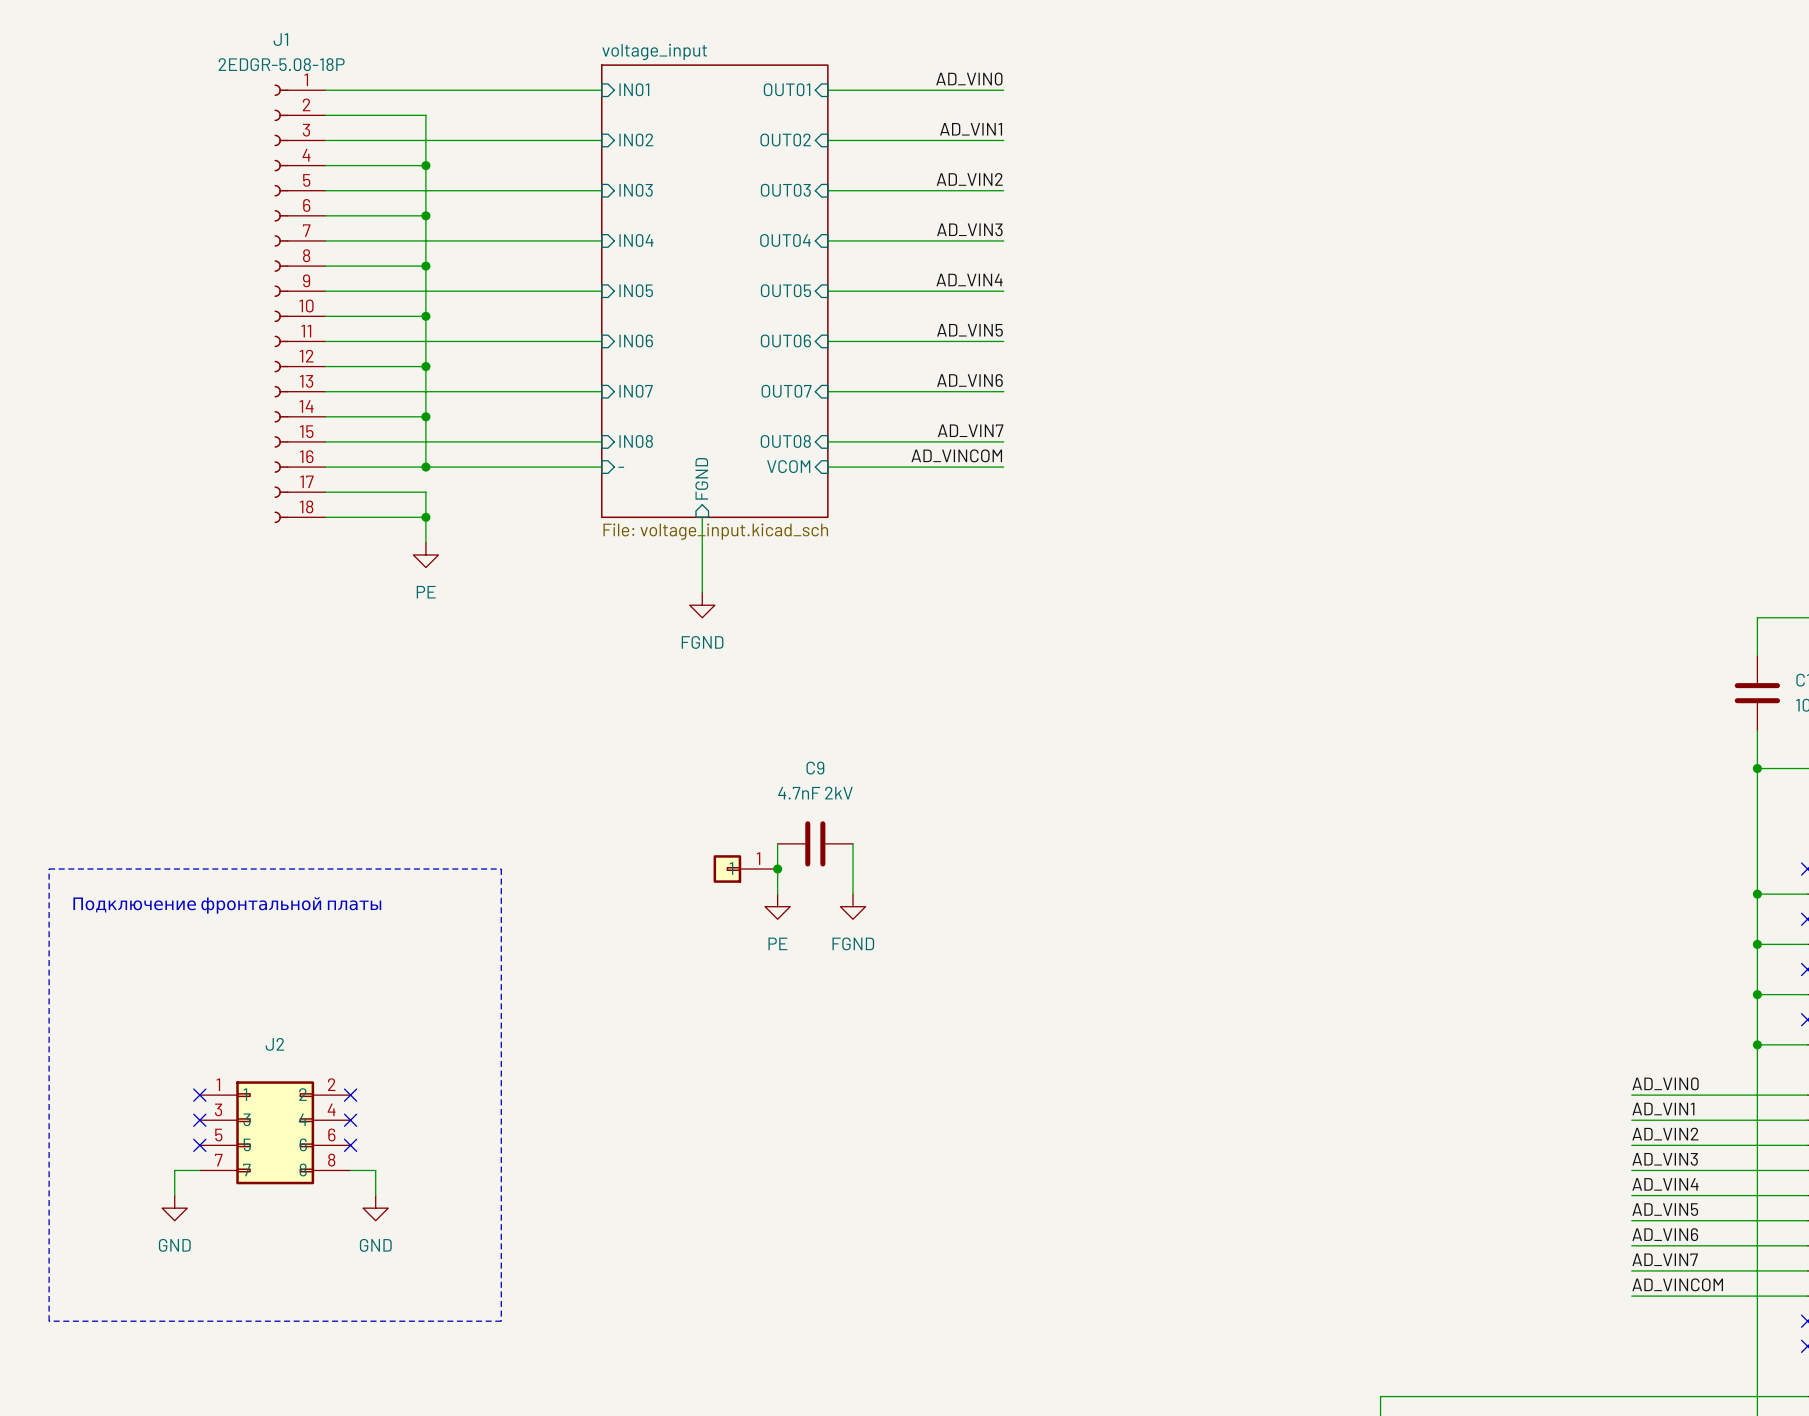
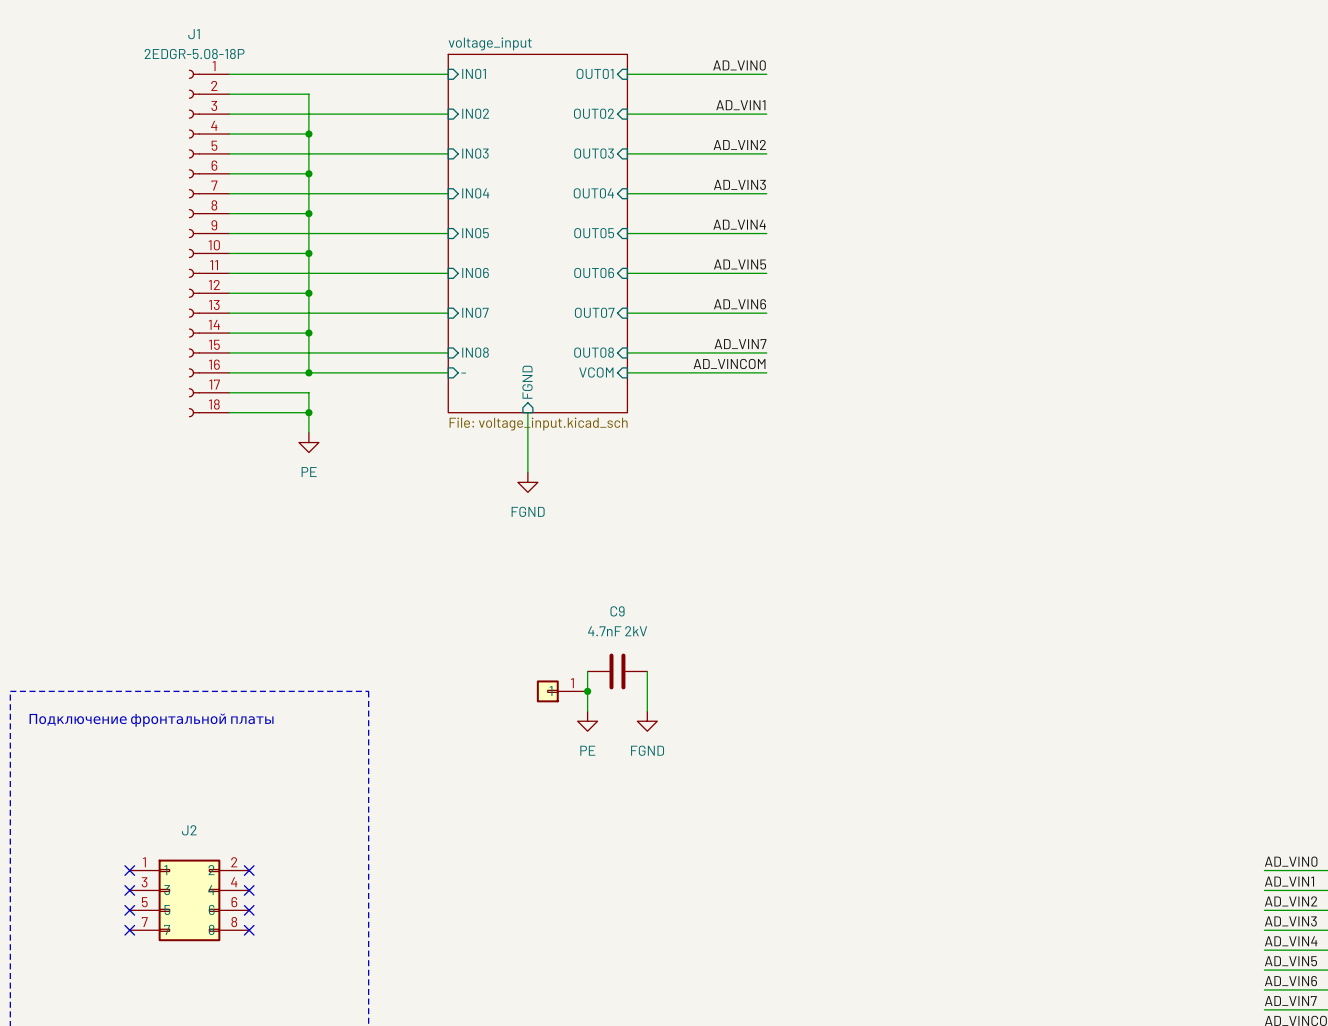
wire: (199, 1170) (174, 1170) (174, 1195) -> none
no-connect mark: none -> (129, 930)
wire: (350, 1170) (375, 1170) (375, 1195) -> none
no-connect mark: none -> (249, 930)
power symbol: GND (174, 1208) -> none
power symbol: GND (375, 1208) -> none

